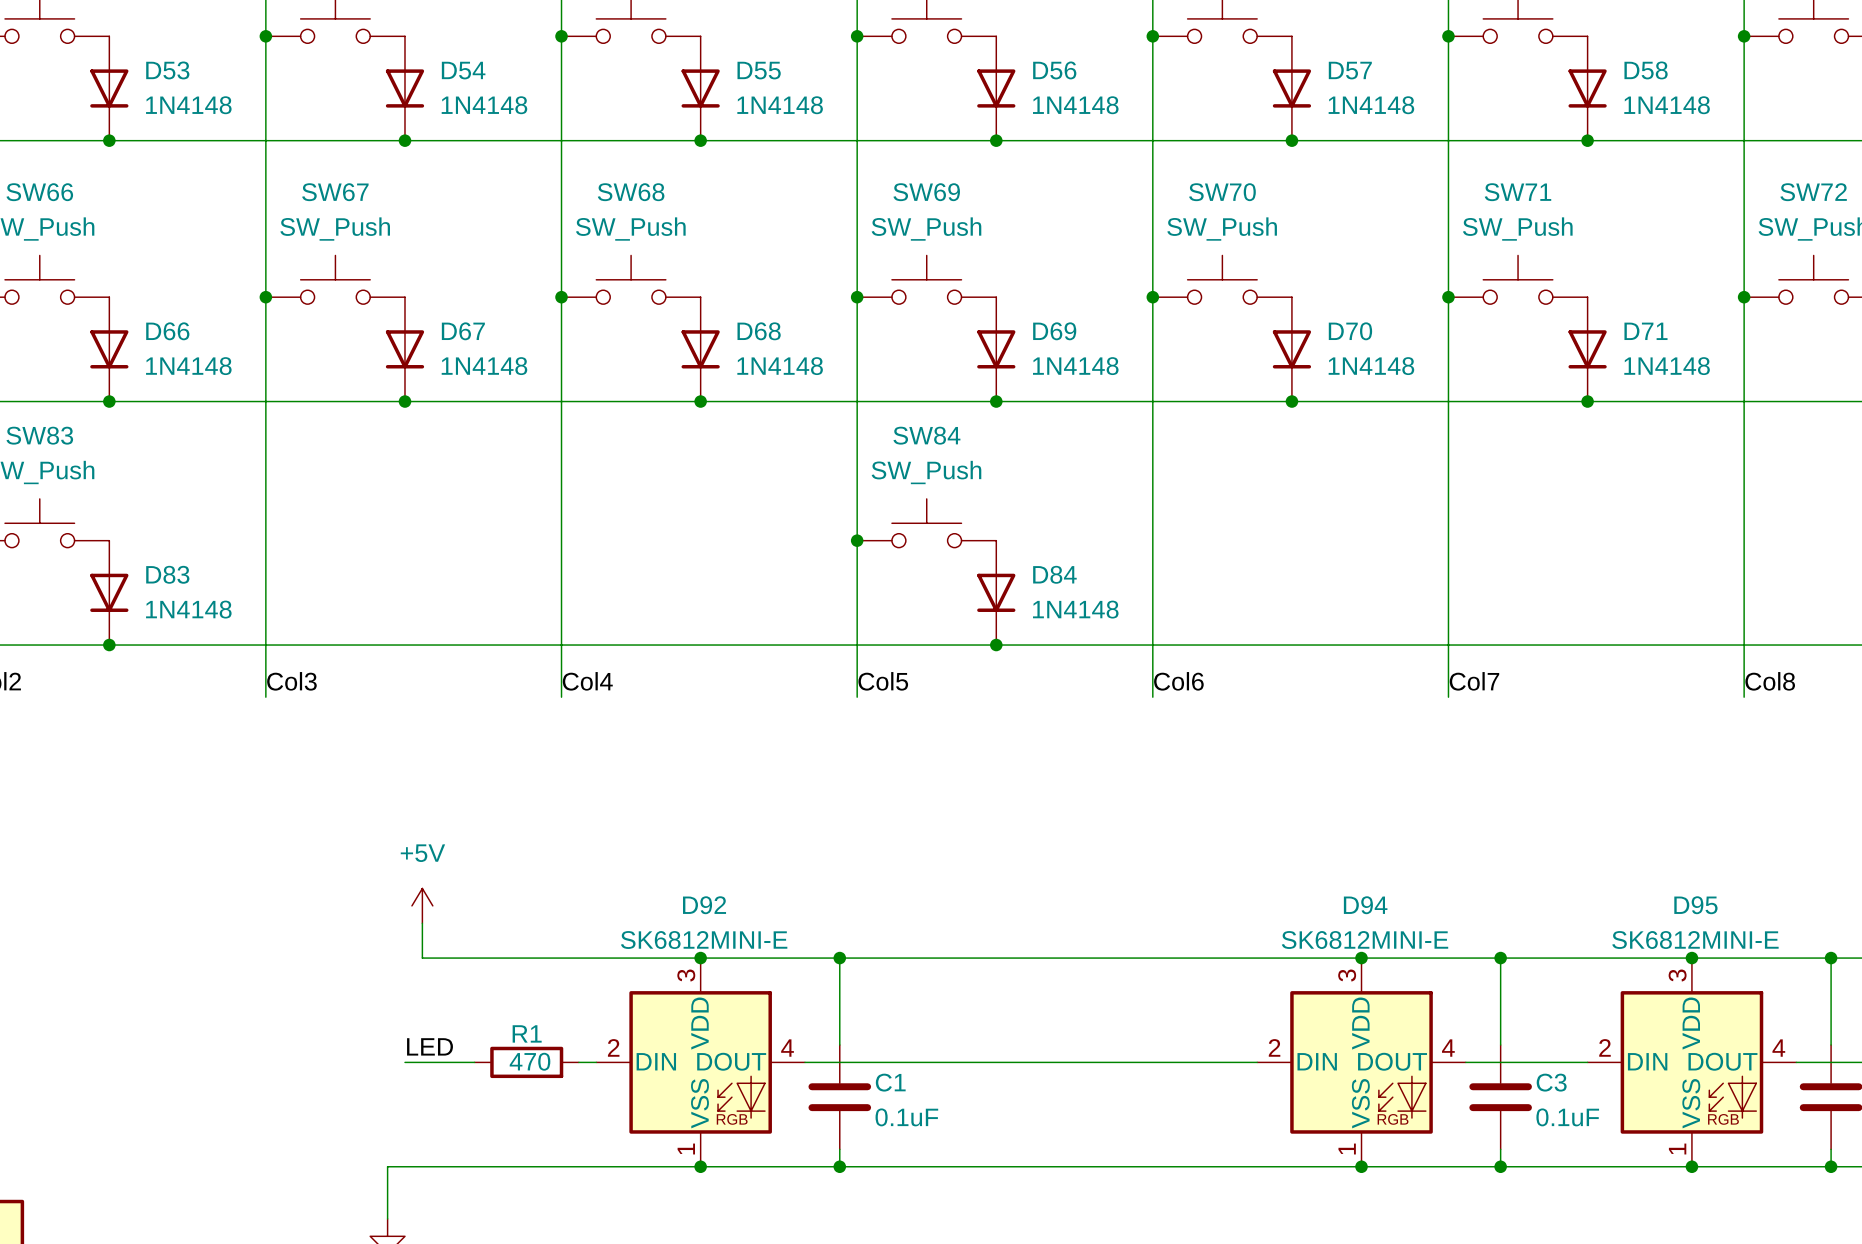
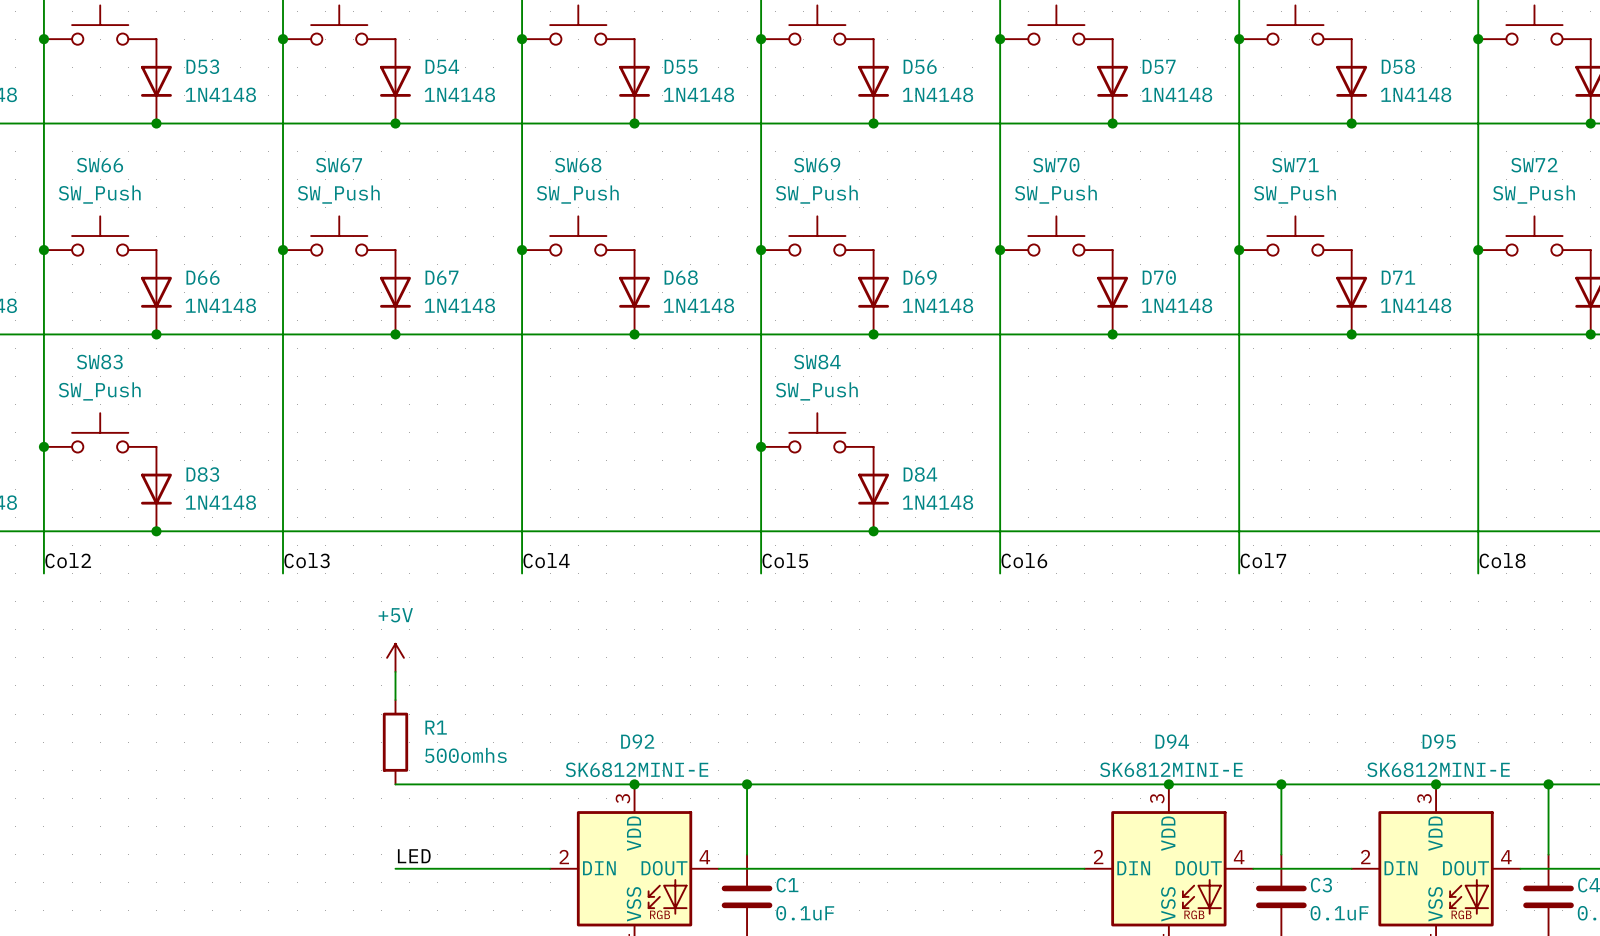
wire: none -> (395, 671) (395, 700)
power symbol position: +5V (422, 905) -> +5V (395, 657)
wire: (422, 923) (422, 958) -> (395, 784) (409, 784)
R1 name position: R1 (527, 1033) -> R1 (436, 727)
R1 value: 470 (530, 1061) -> 500omhs (465, 755)
wire: none -> (451, 868) (536, 868)
R1 rotation: 0° (526, 1062) -> 90° clockwise (395, 742)
R1 position: (526, 1062) -> (395, 742)

